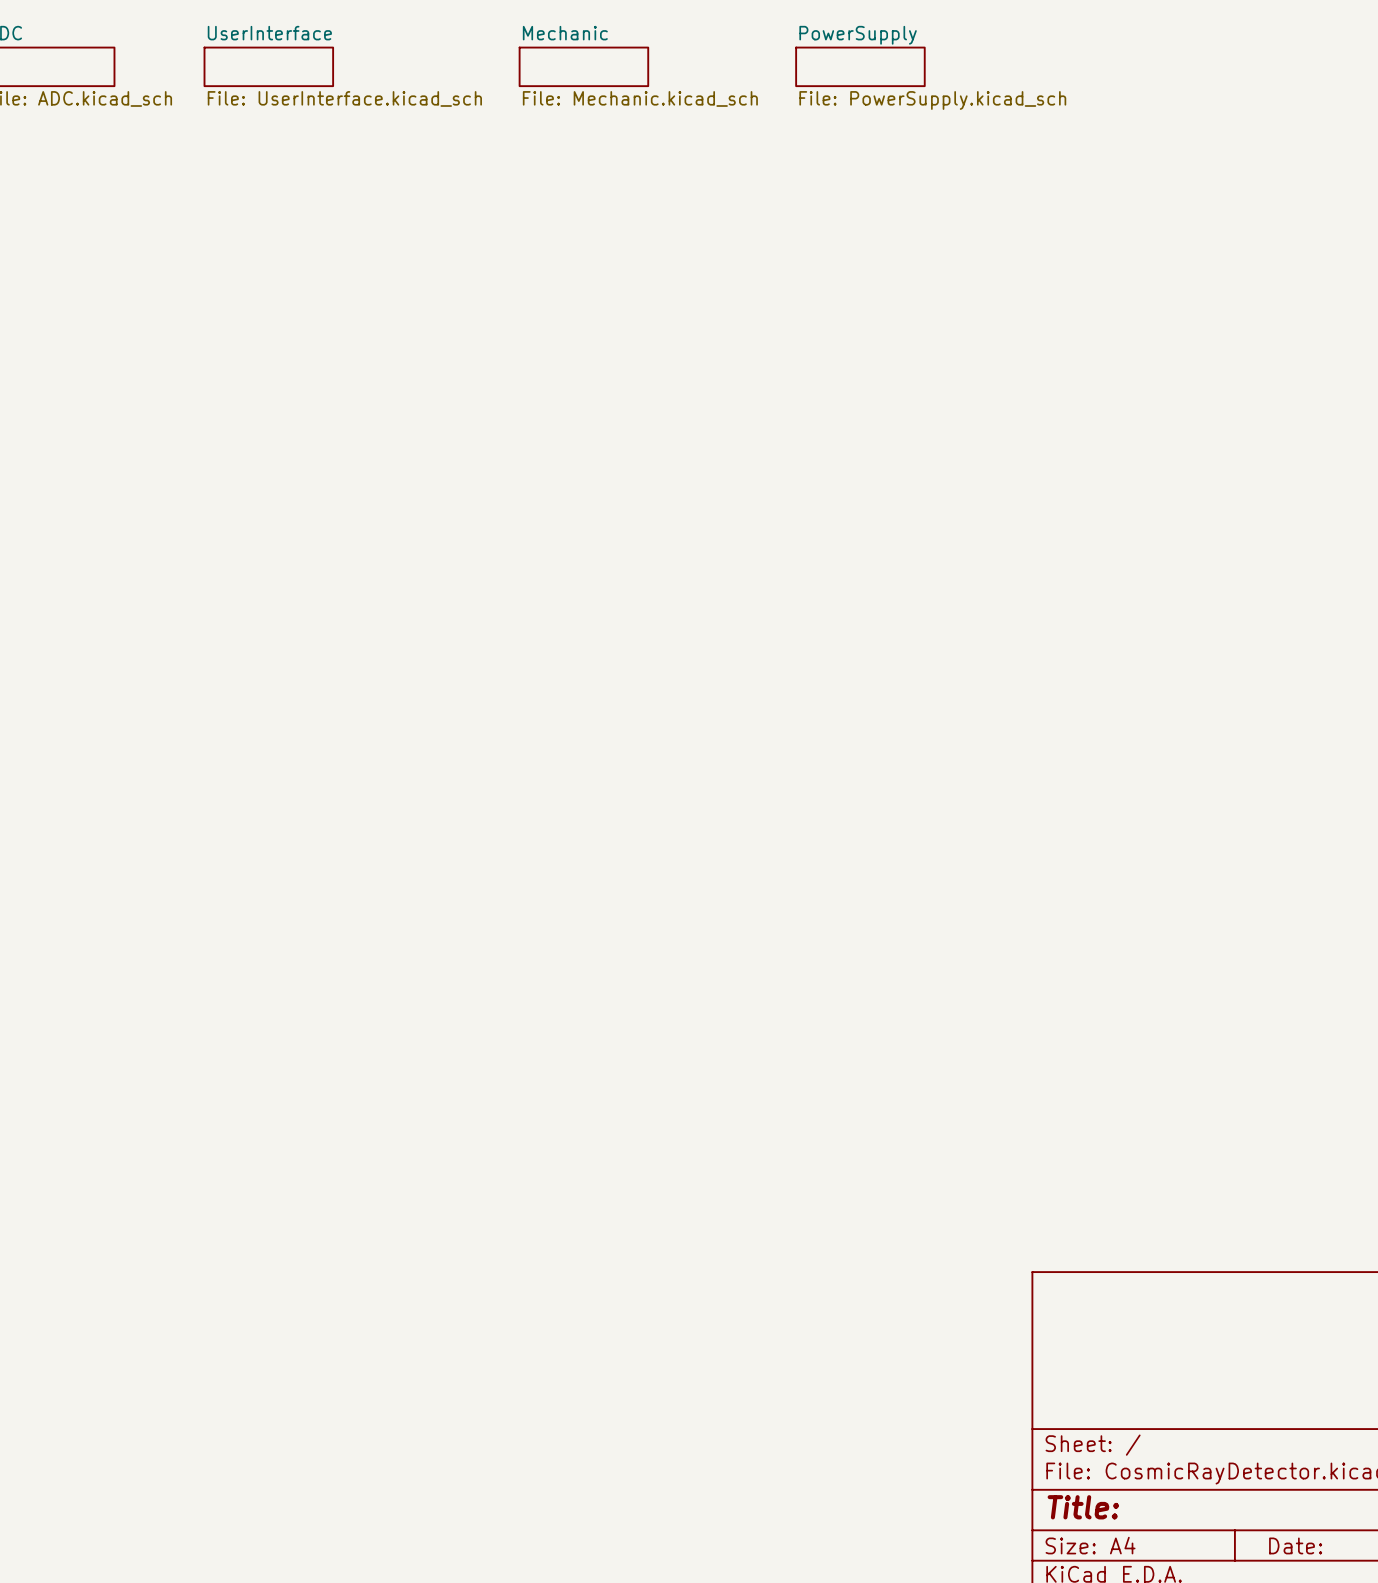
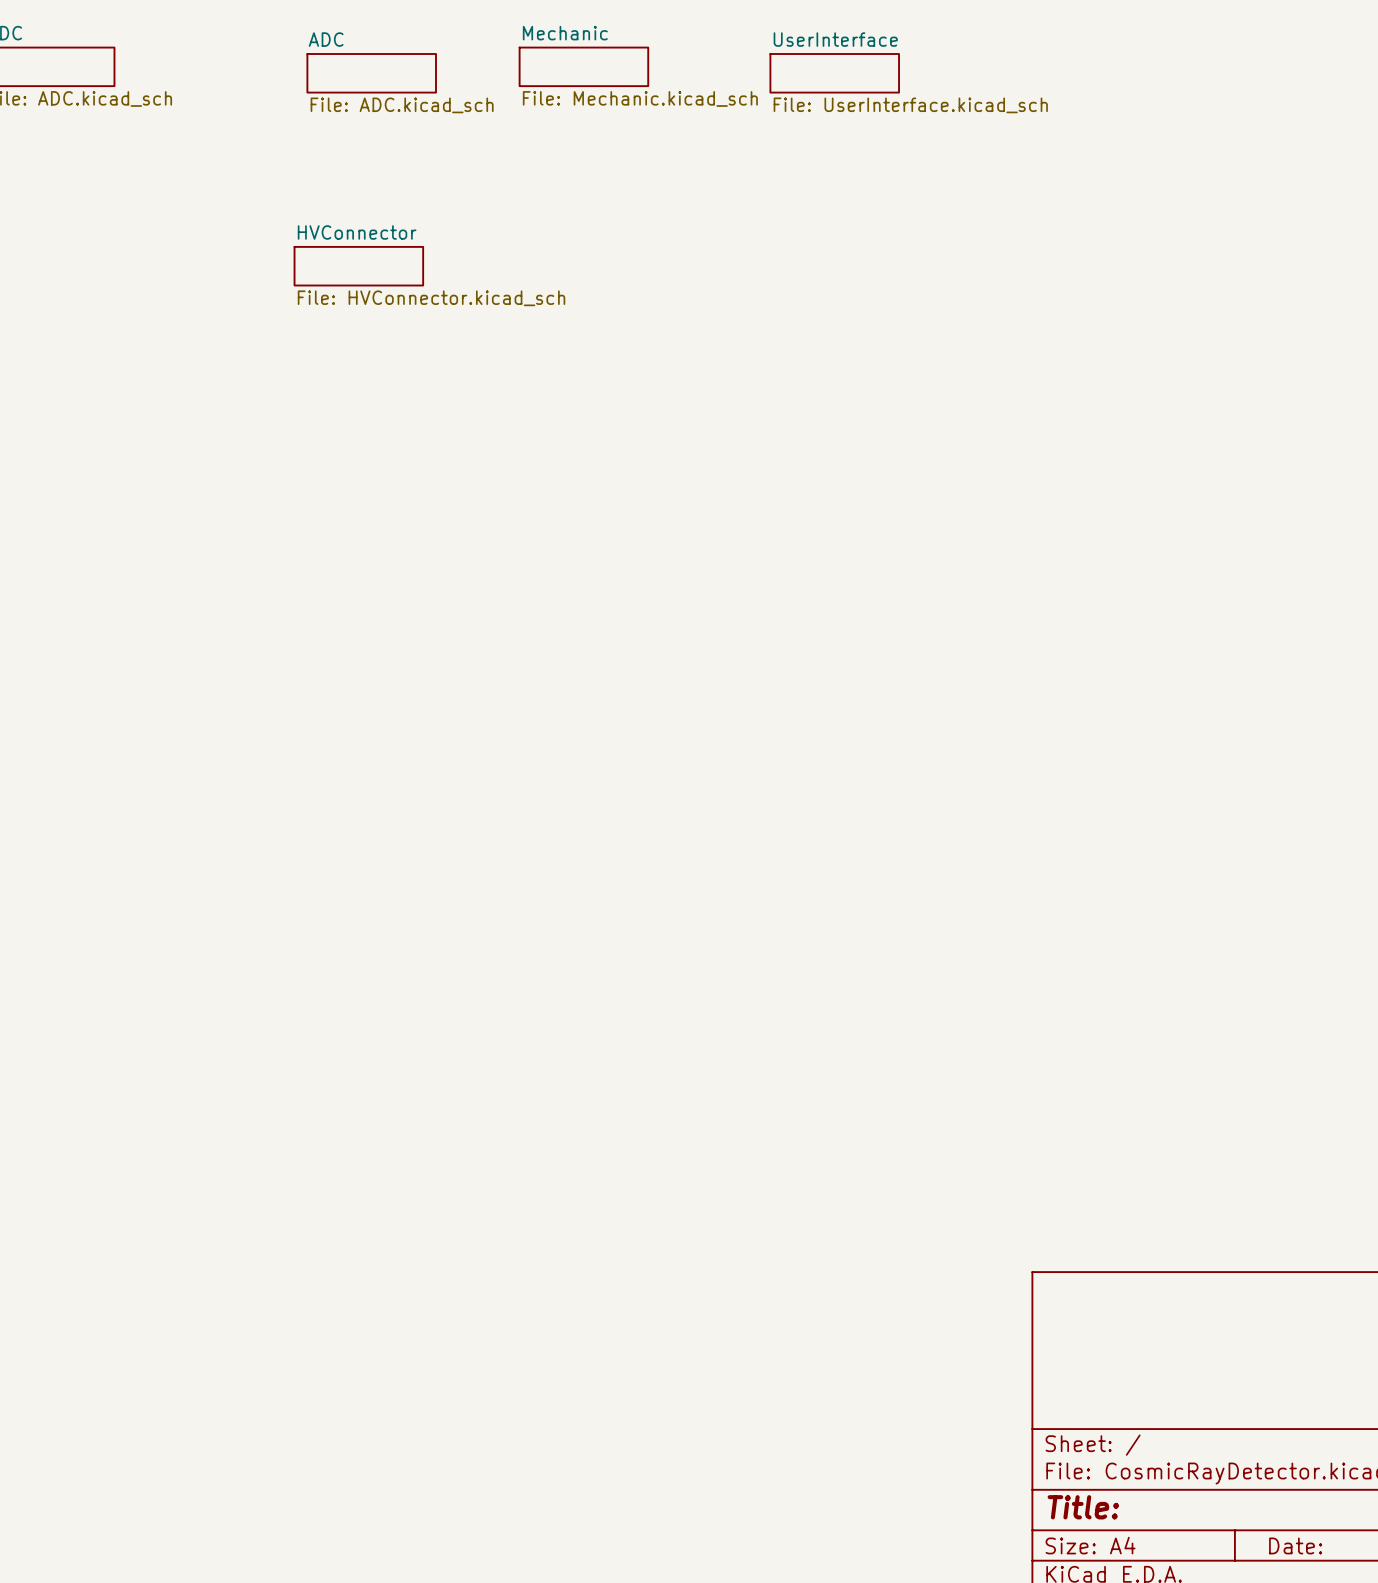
sheet UserInterface: File: UserInterface.kicad_sch (268, 66) -> none
sheet PowerSupply: File: PowerSupply.kicad_sch (860, 66) -> none
sheet ADC: none -> File: ADC.kicad_sch (371, 73)
sheet UserInterface: none -> File: UserInterface.kicad_sch (834, 73)
sheet HVConnector: none -> File: HVConnector.kicad_sch (358, 266)

